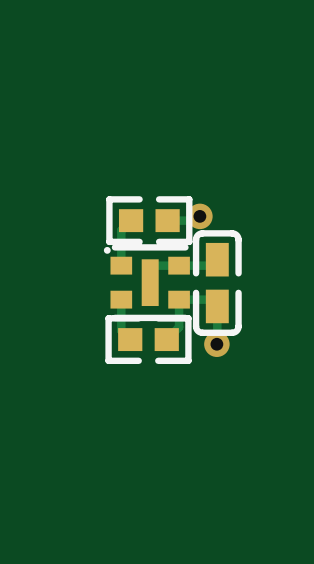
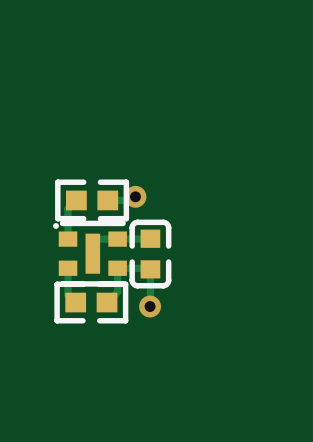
part footprint: [192, 230, 242, 336] -> [129, 219, 172, 289]

